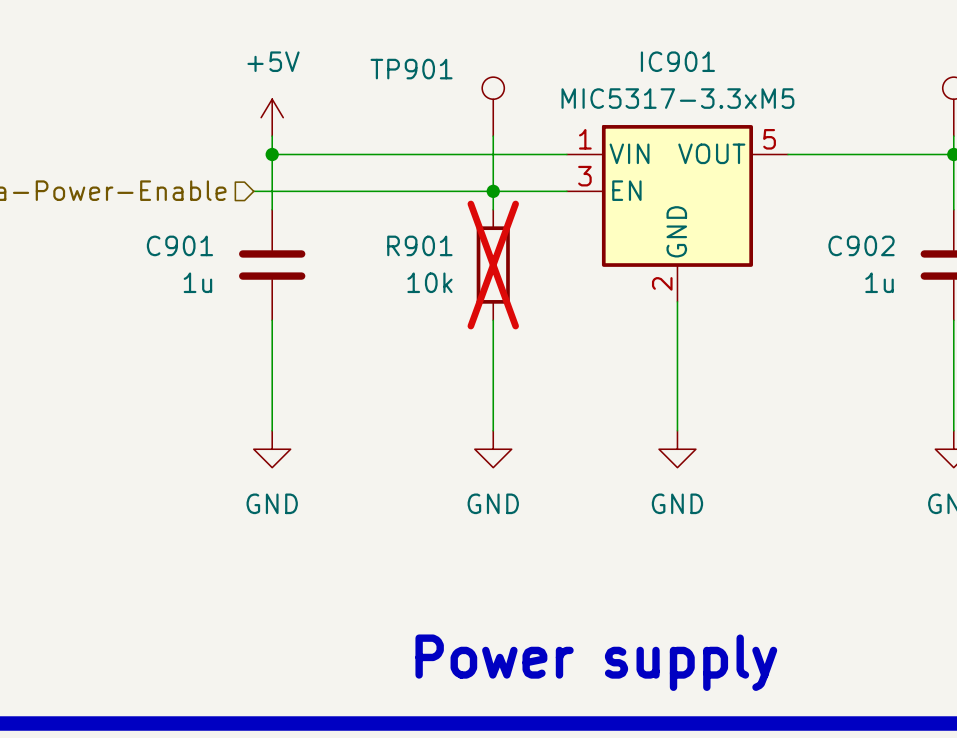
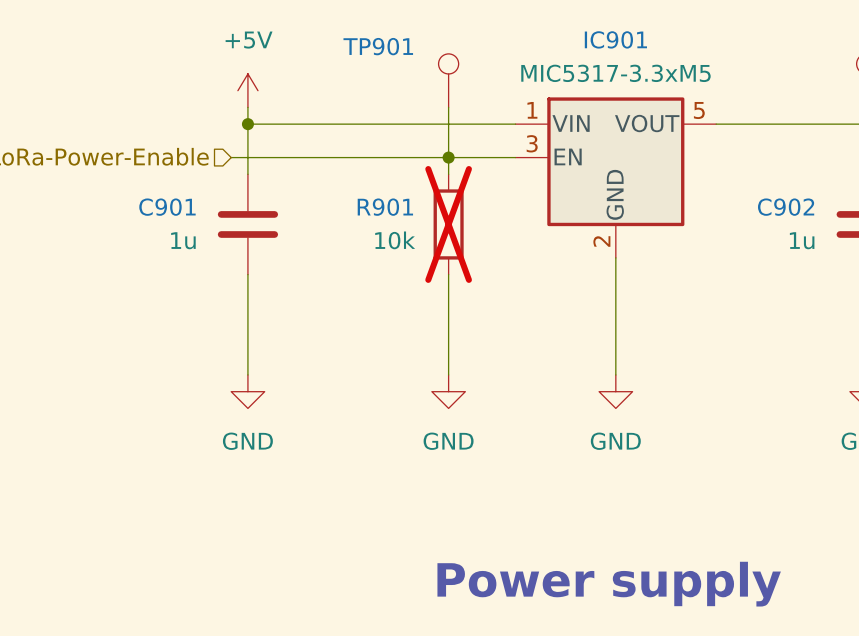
text position: Power supply (596, 662) -> Power supply (609, 584)

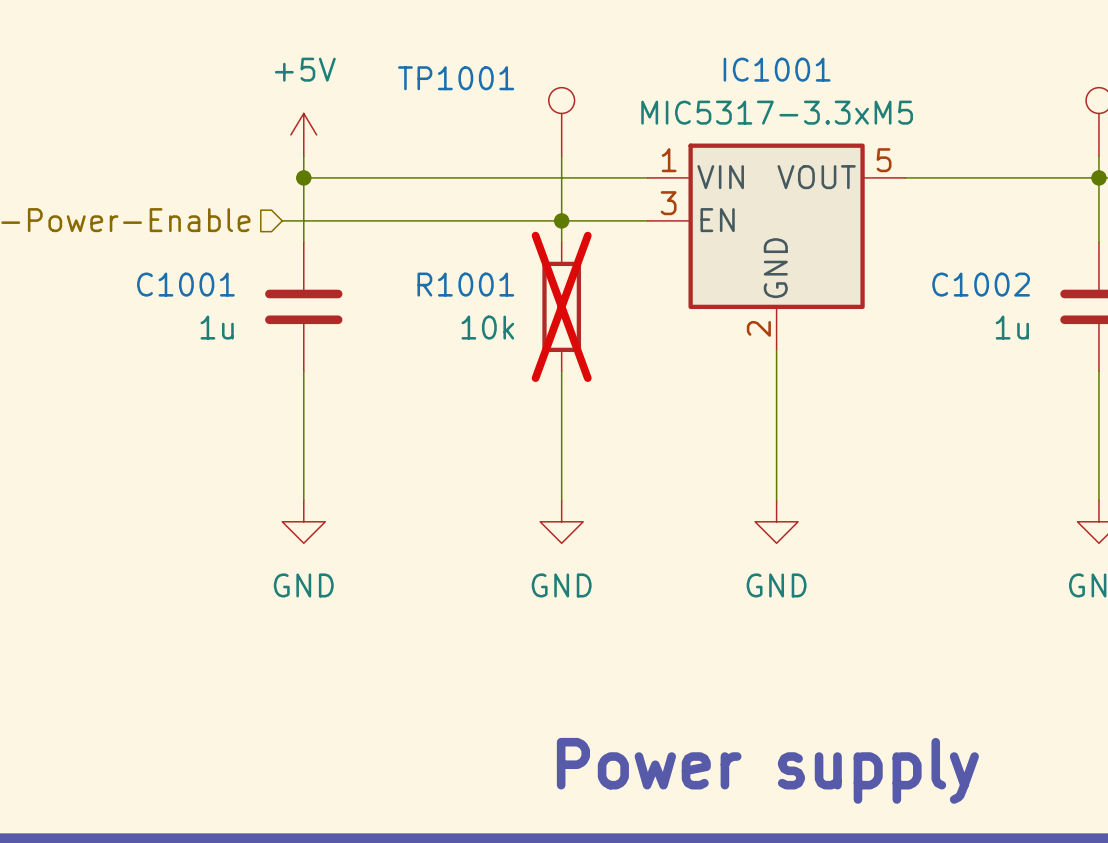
IC901 name: IC901 (615, 39) -> IC1001 (777, 69)
TP901 name: TP901 (378, 46) -> TP1001 (456, 78)
C901 name: C901 (167, 207) -> C1001 (185, 284)
R901 name: R901 (385, 207) -> R1001 (465, 284)
C902 name: C902 (786, 207) -> C1002 (981, 284)

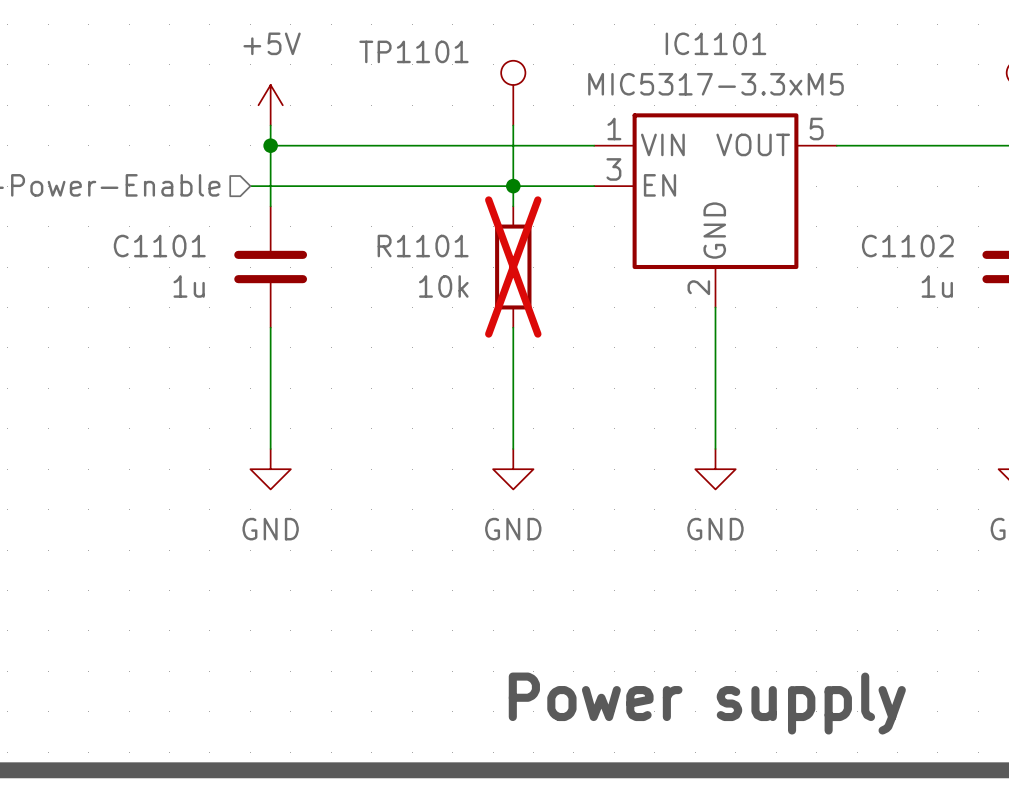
IC1001 name: IC1001 (777, 69) -> IC1101 (715, 43)
TP1001 name: TP1001 (456, 78) -> TP1101 (413, 51)
C1001 name: C1001 (185, 284) -> C1101 (159, 246)
R1001 name: R1001 (465, 284) -> R1101 (423, 246)
C1002 name: C1002 (981, 284) -> C1102 (907, 246)

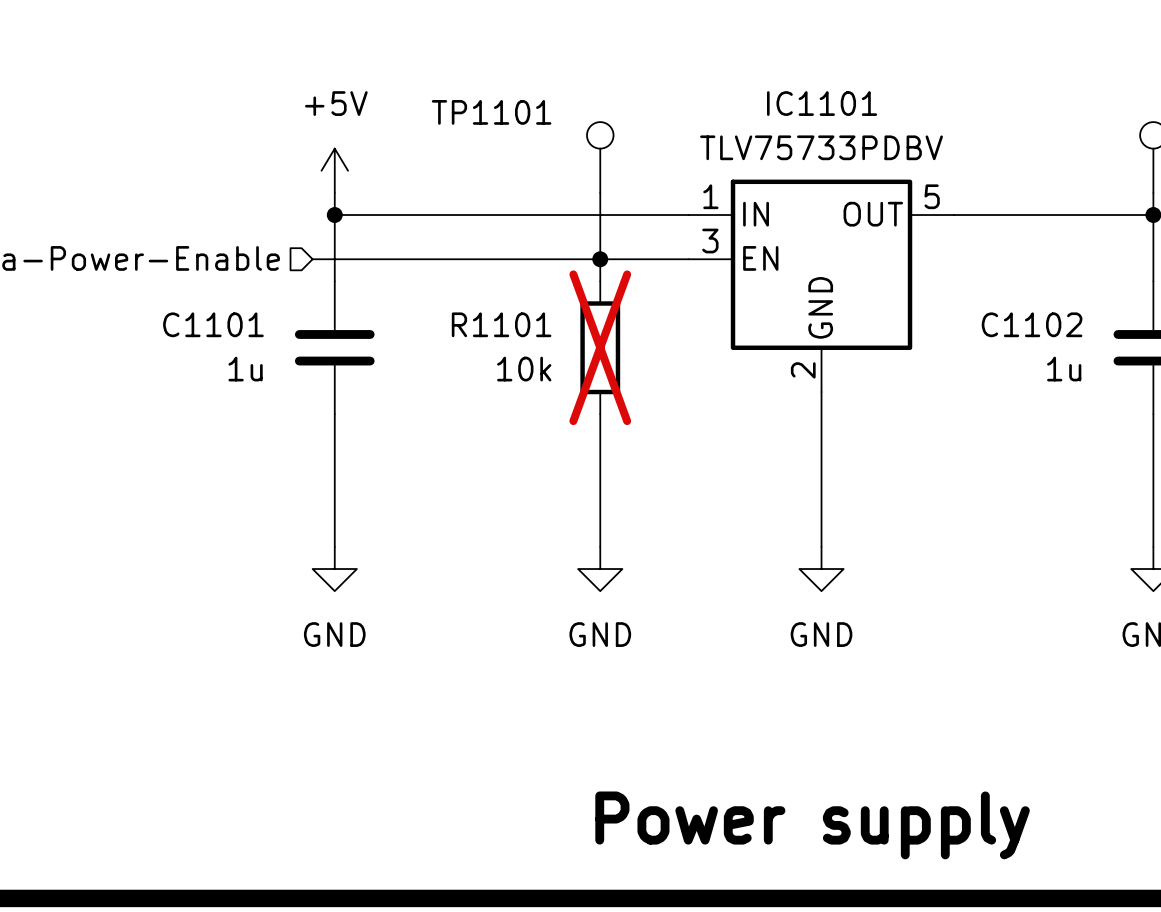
IC1101 value: MIC5317-3.3xM5 (715, 84) -> TLV75733PDBV (821, 147)
IC1101 pin name: VIN (662, 144) -> IN (756, 214)
IC1101 pin name: VOUT (753, 144) -> OUT (873, 214)

